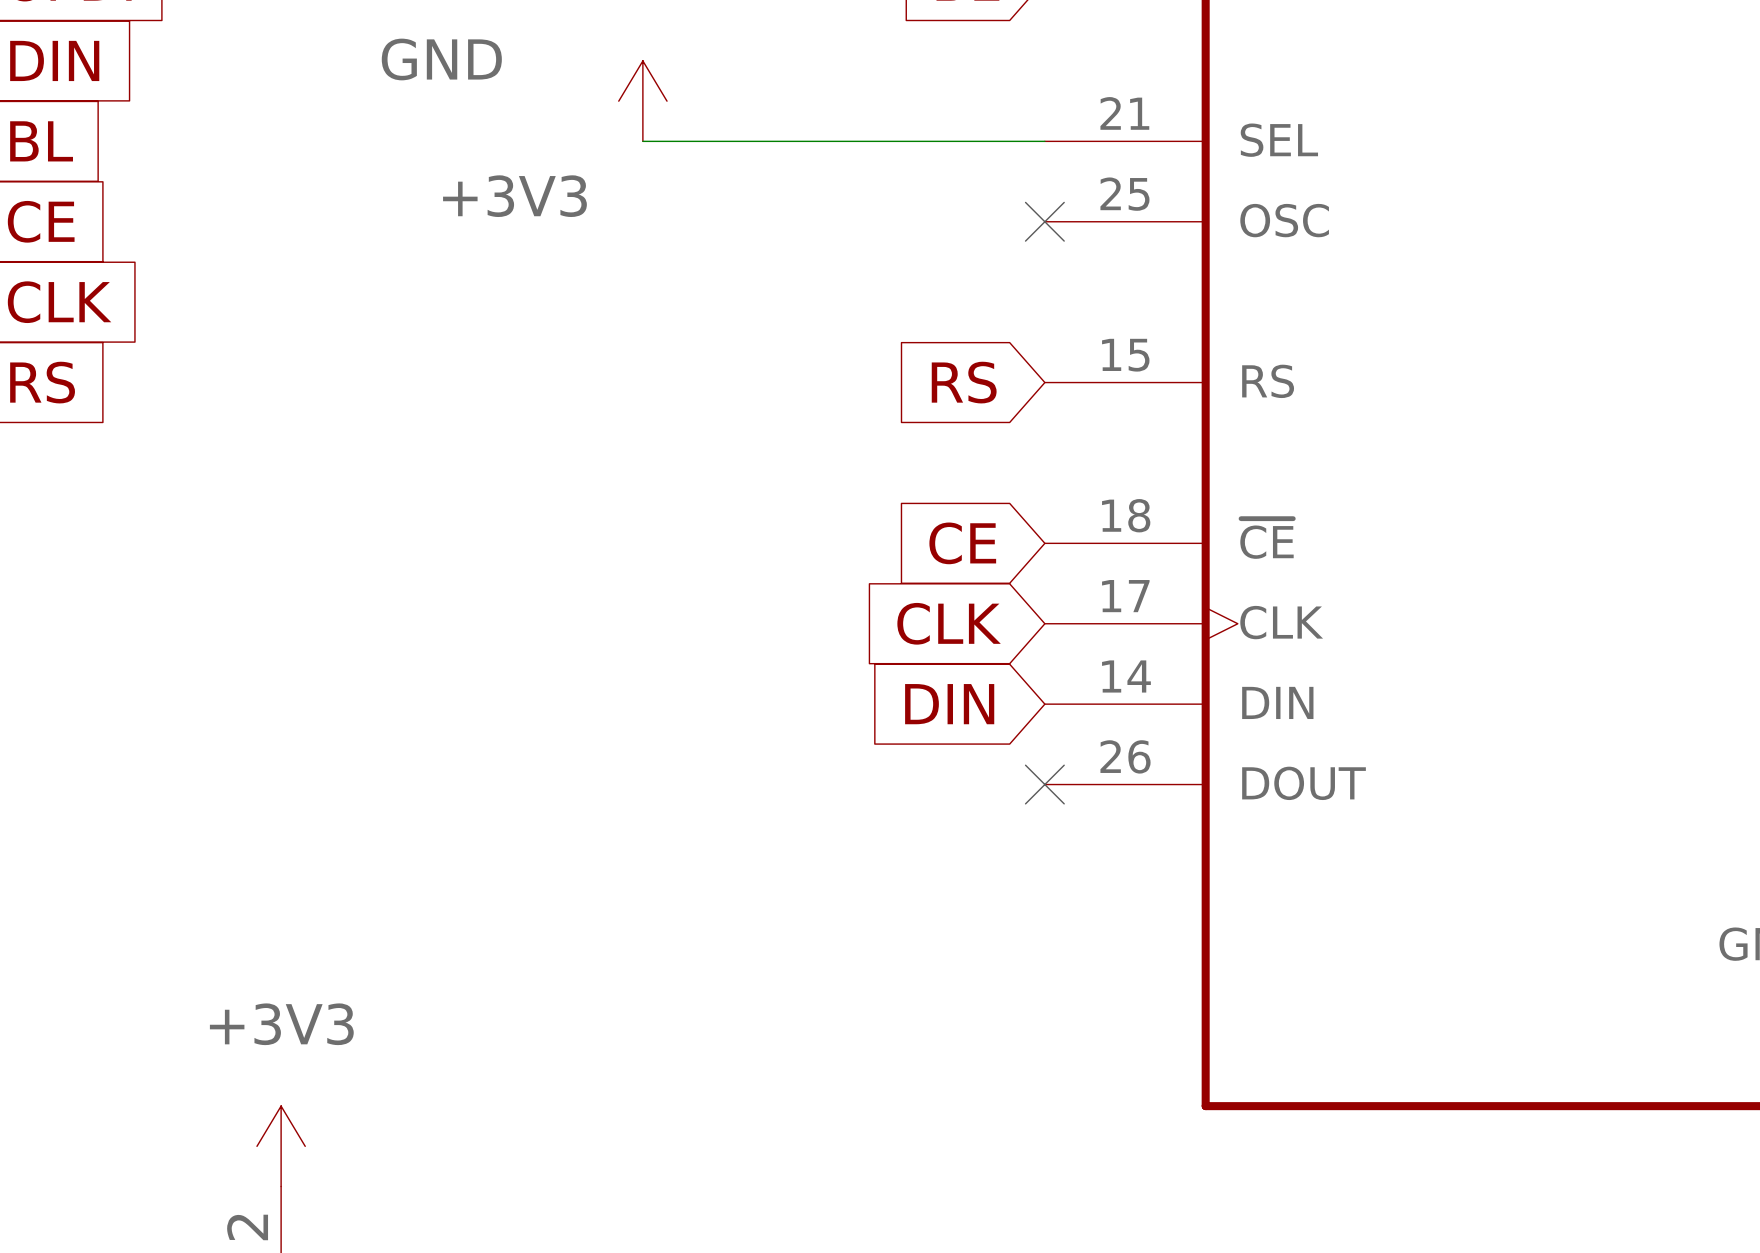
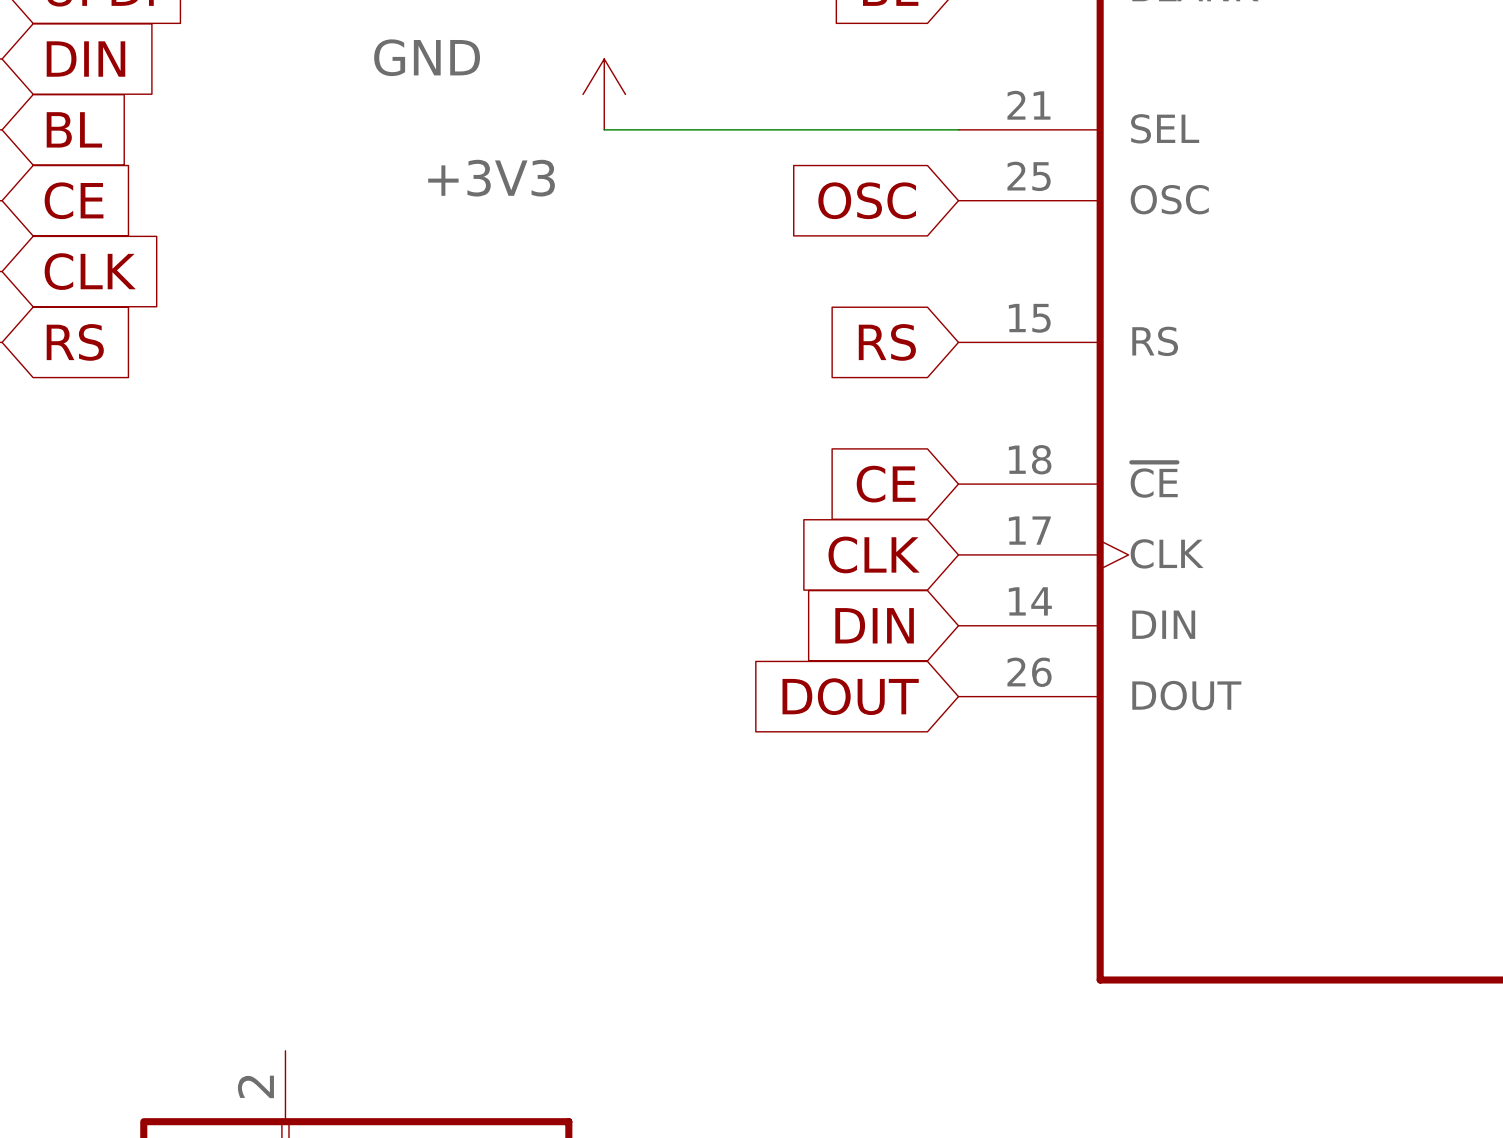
global label: none -> OSC (867, 200)
no-connect mark: (1044, 221) -> none
global label: none -> DOUT (850, 696)
no-connect mark: (1044, 784) -> none
power symbol: +3V3 (281, 1146) -> none

